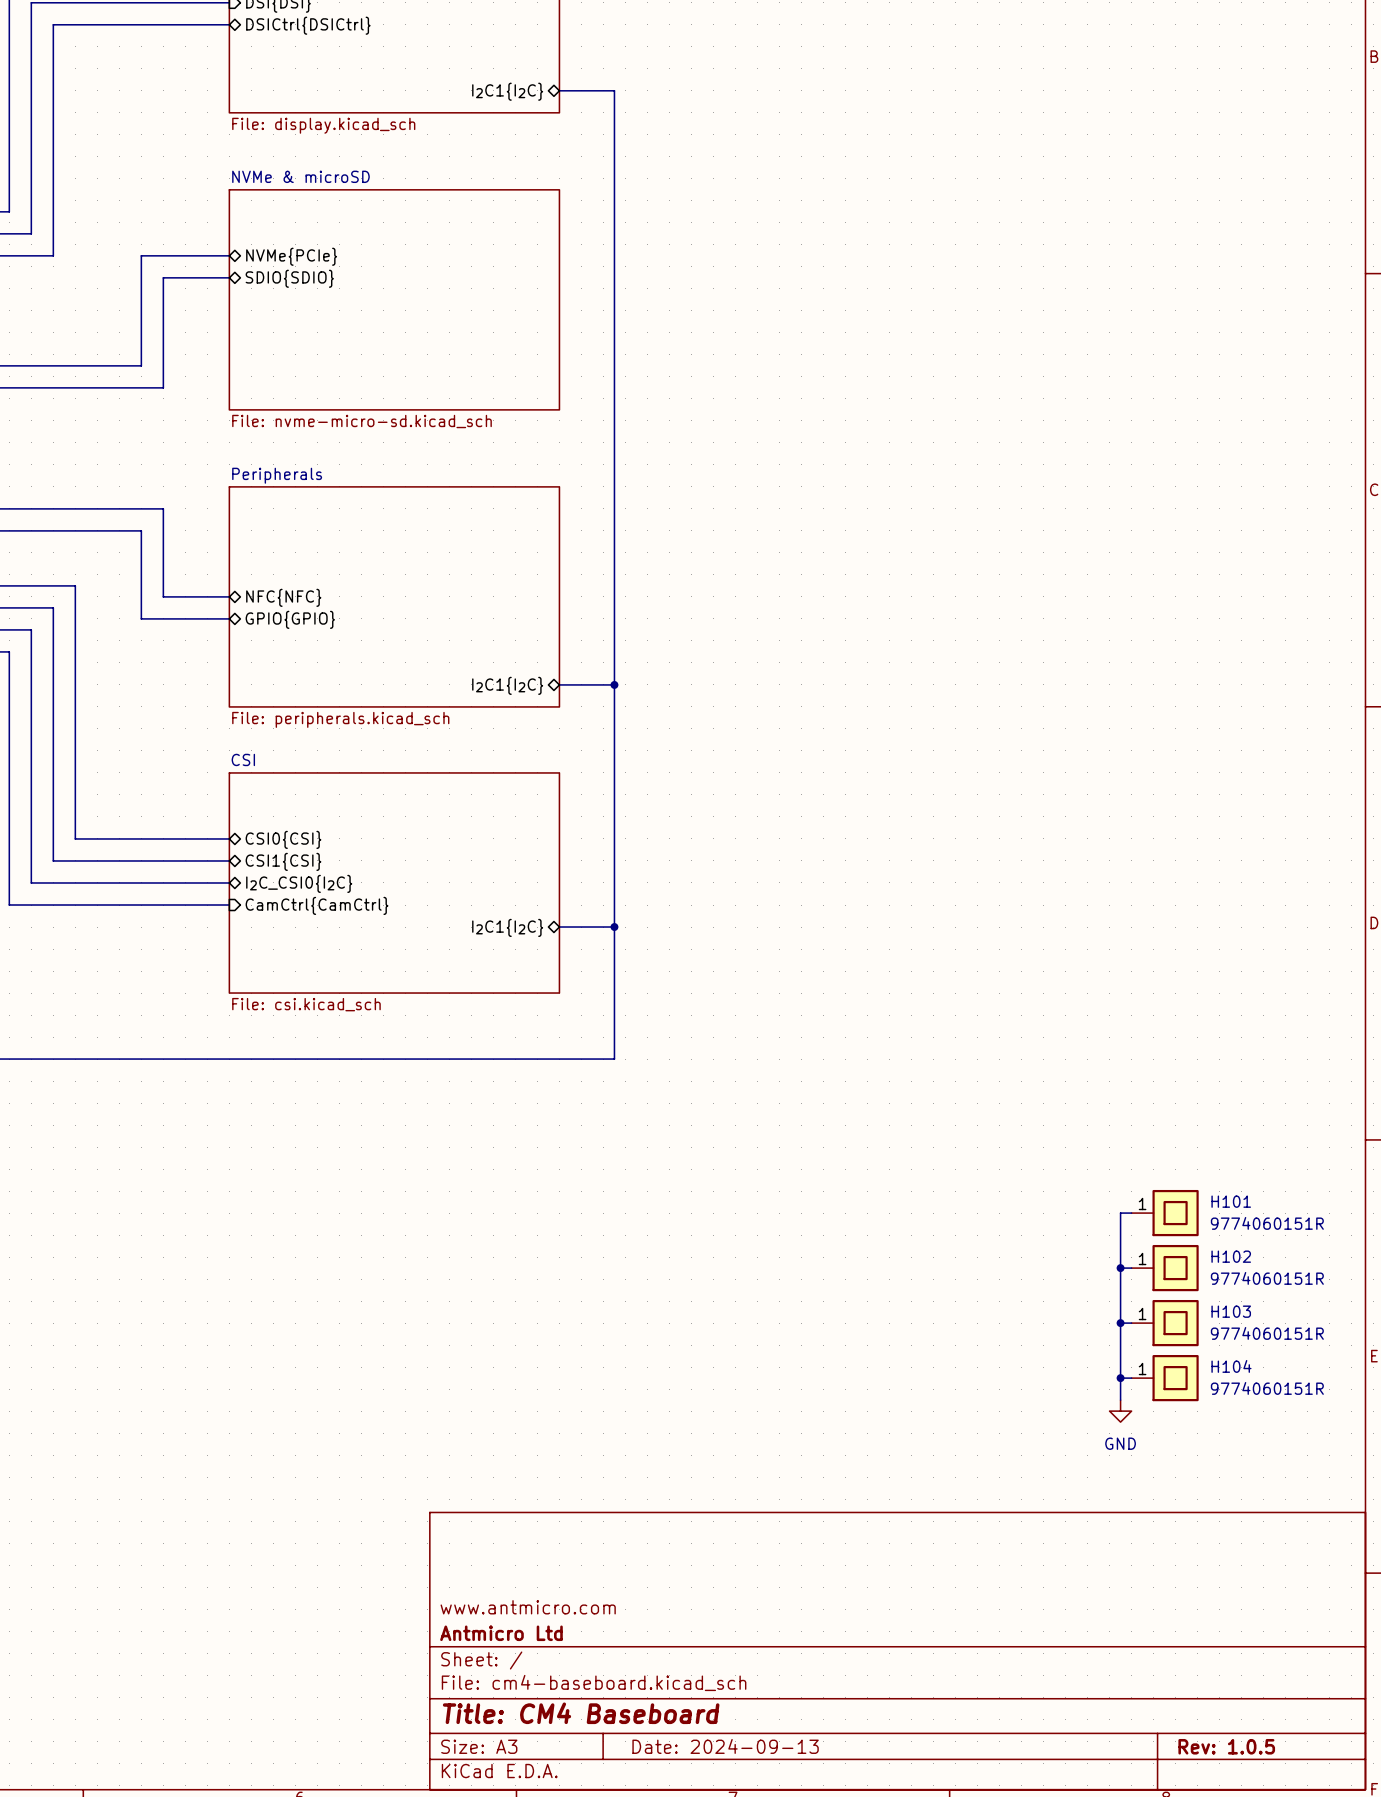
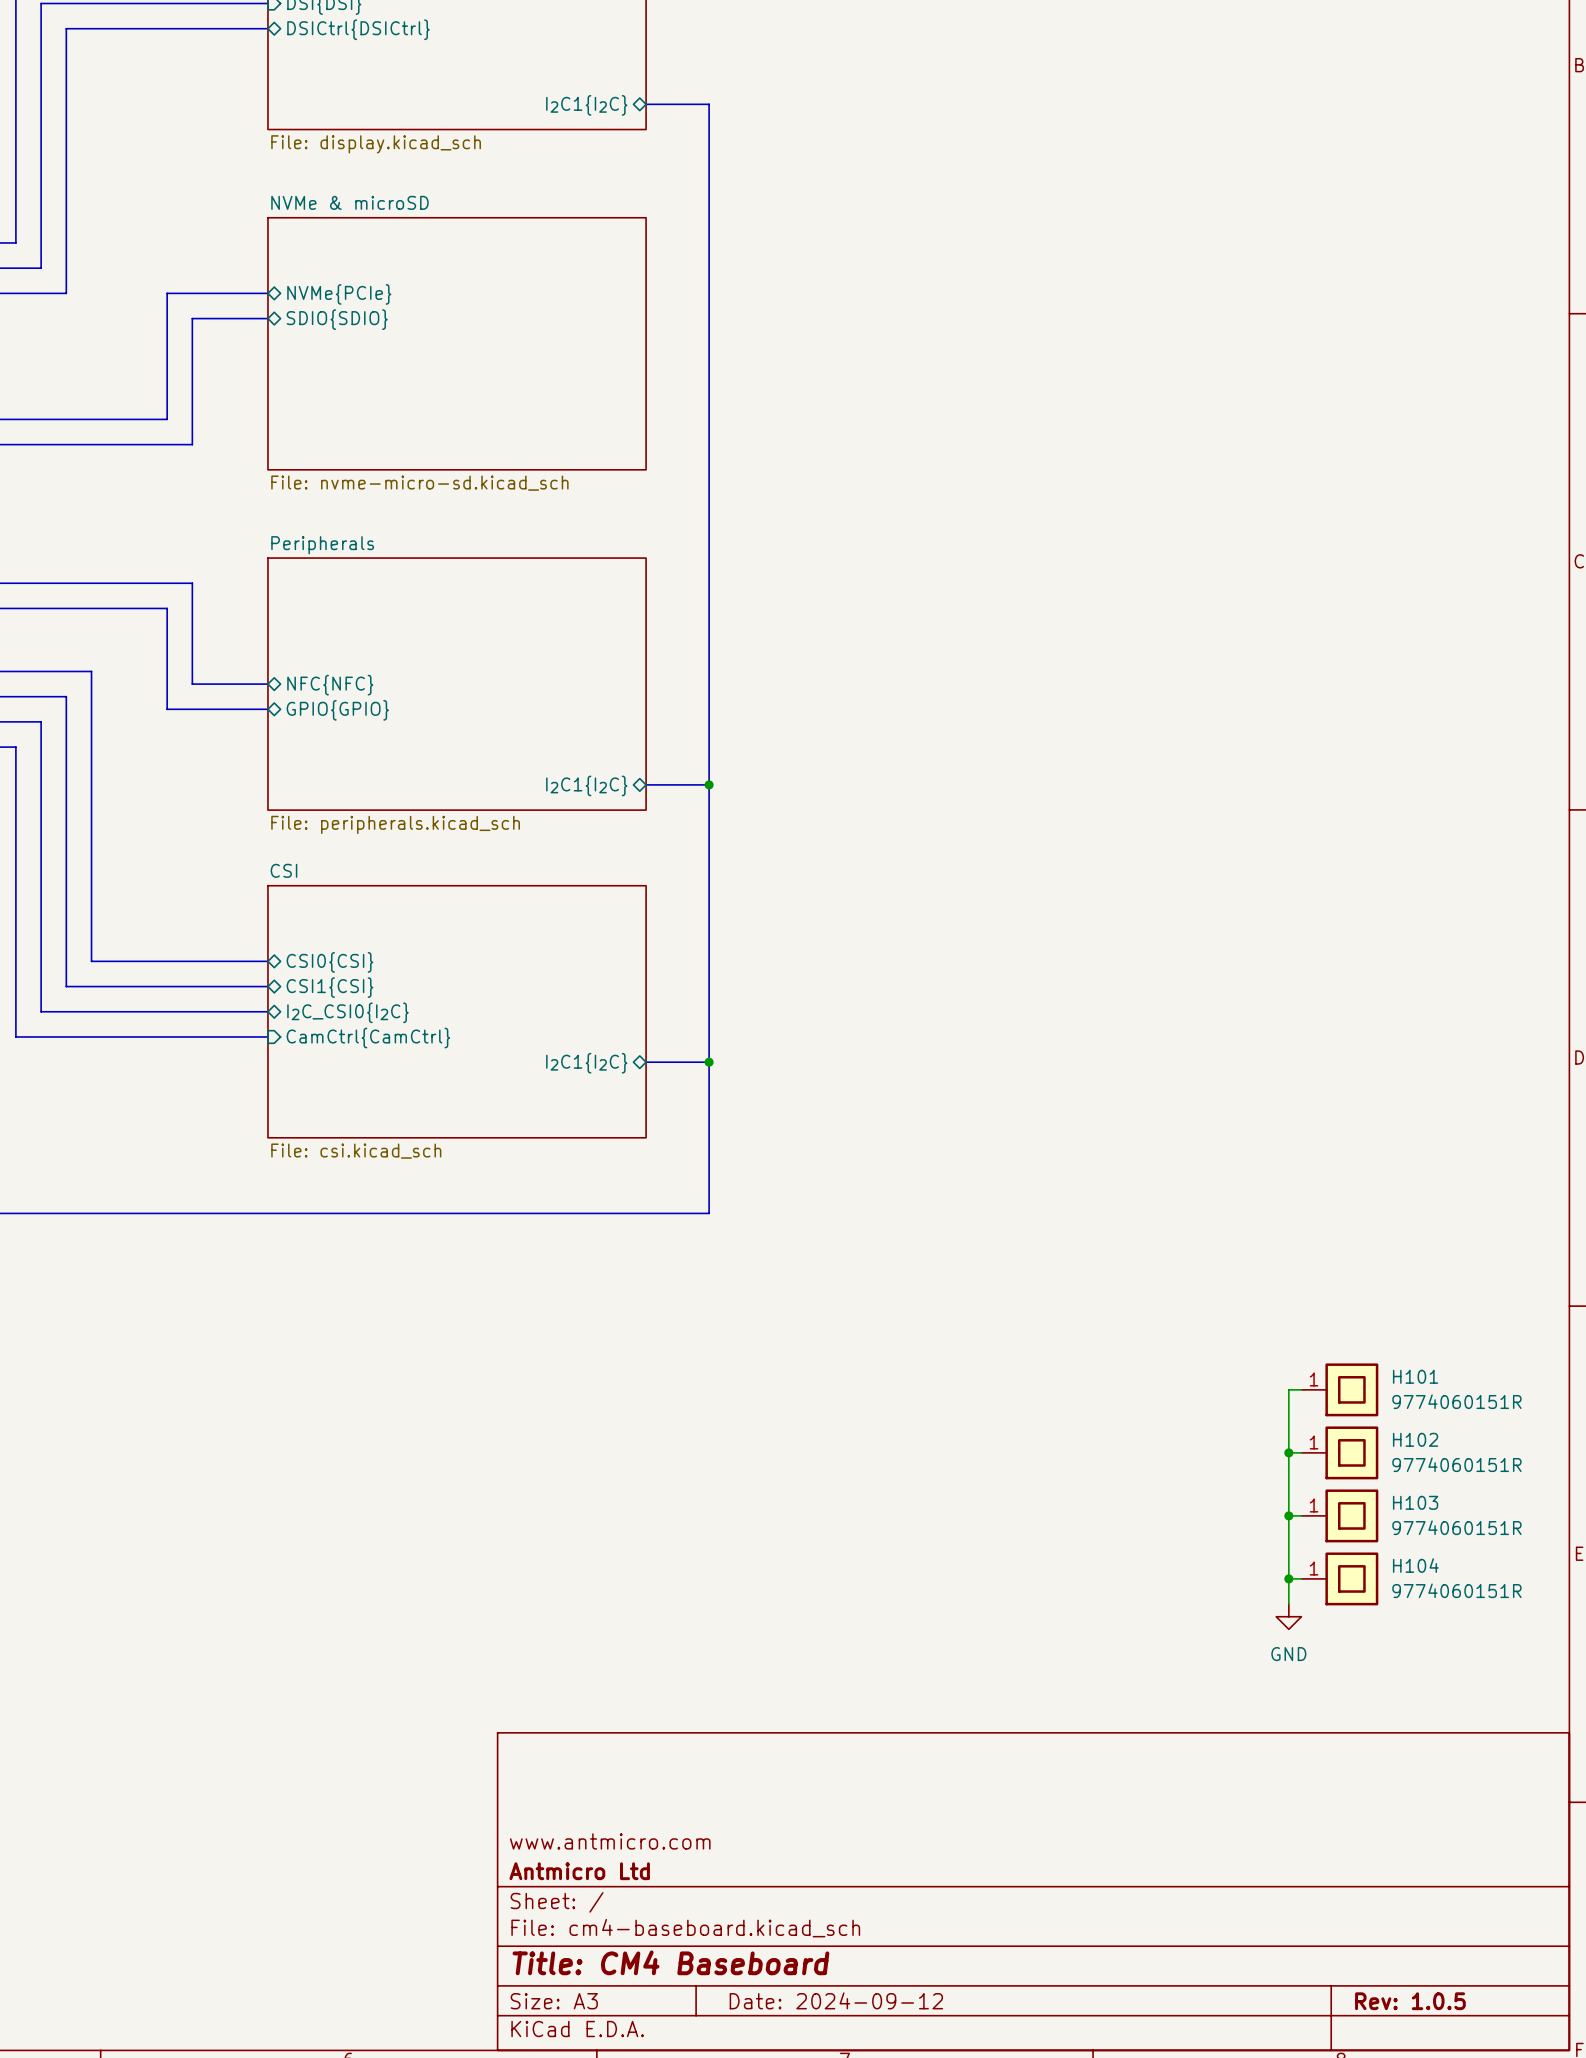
title block: Date: 2024-09-13 (725, 1746) -> Date: 2024-09-12 (836, 2000)

